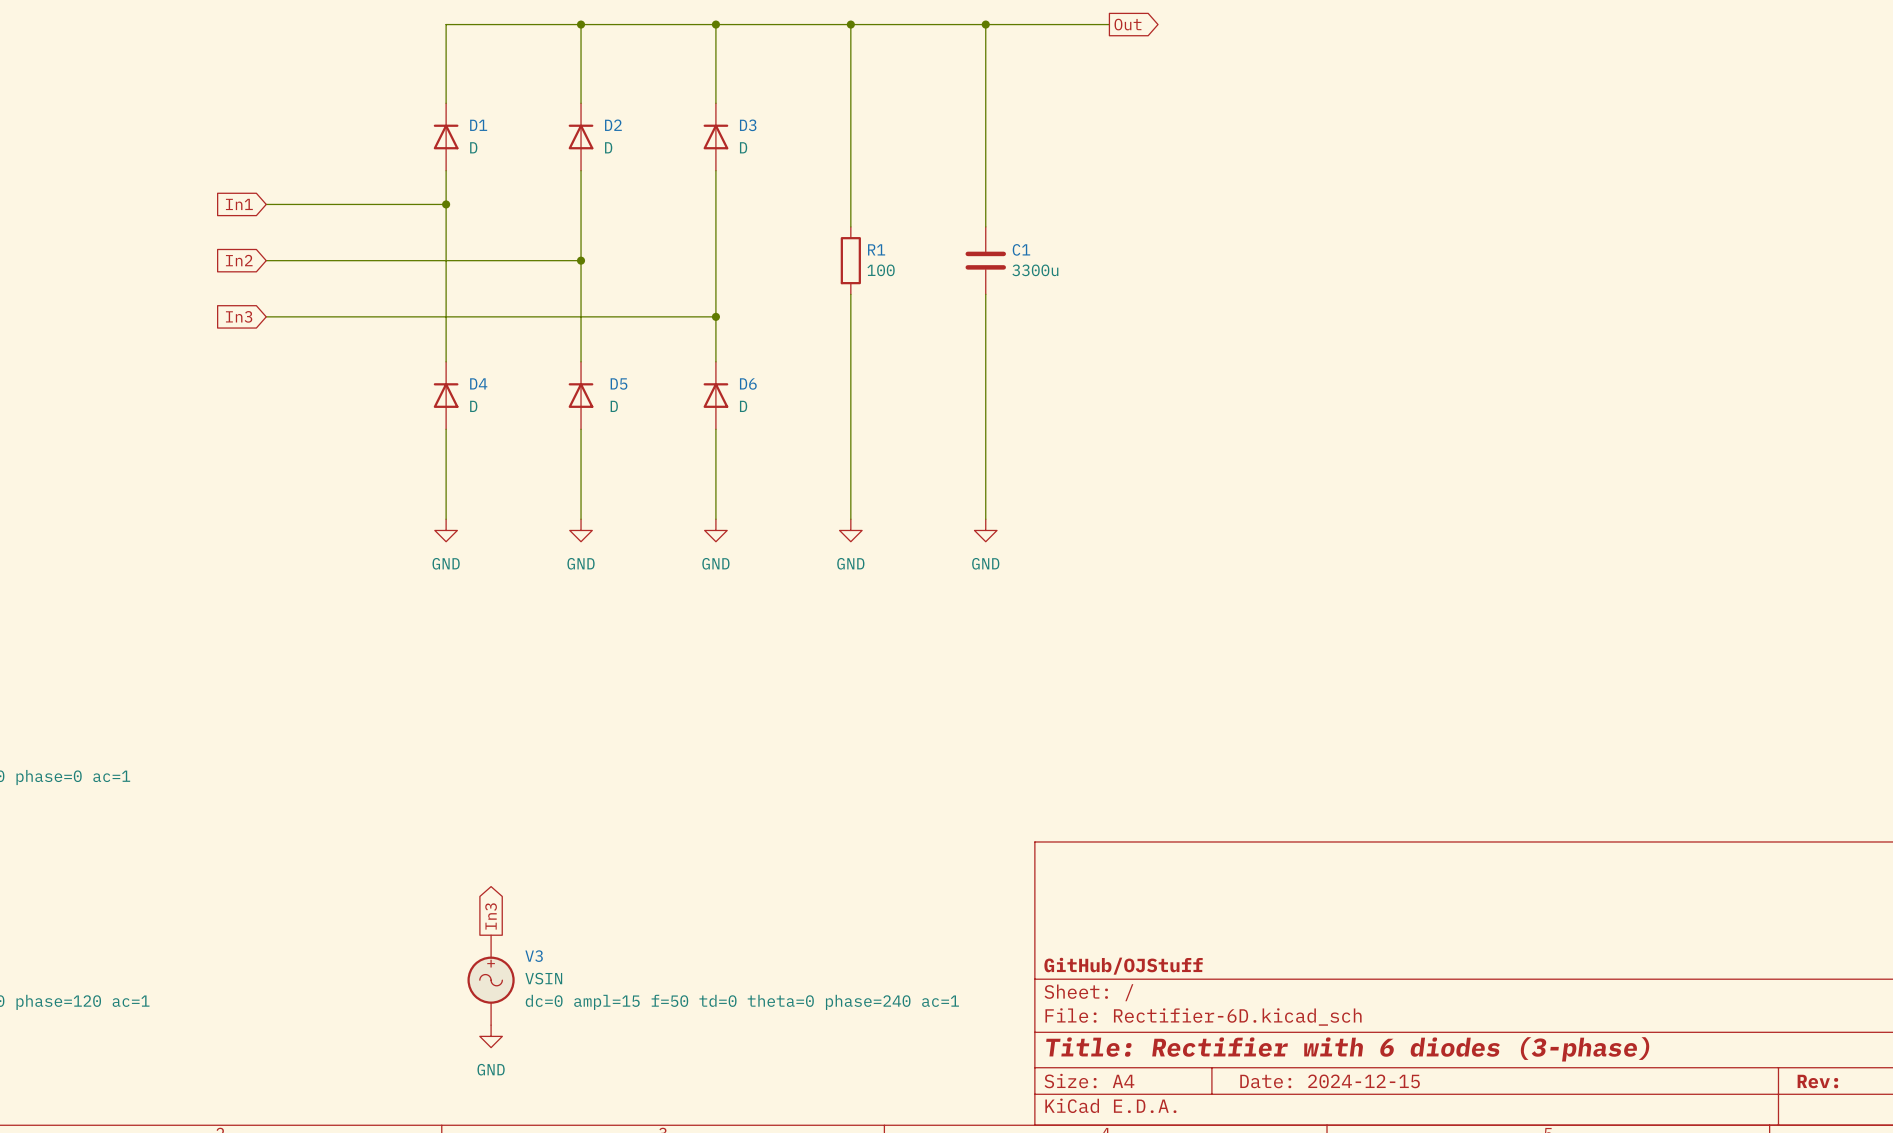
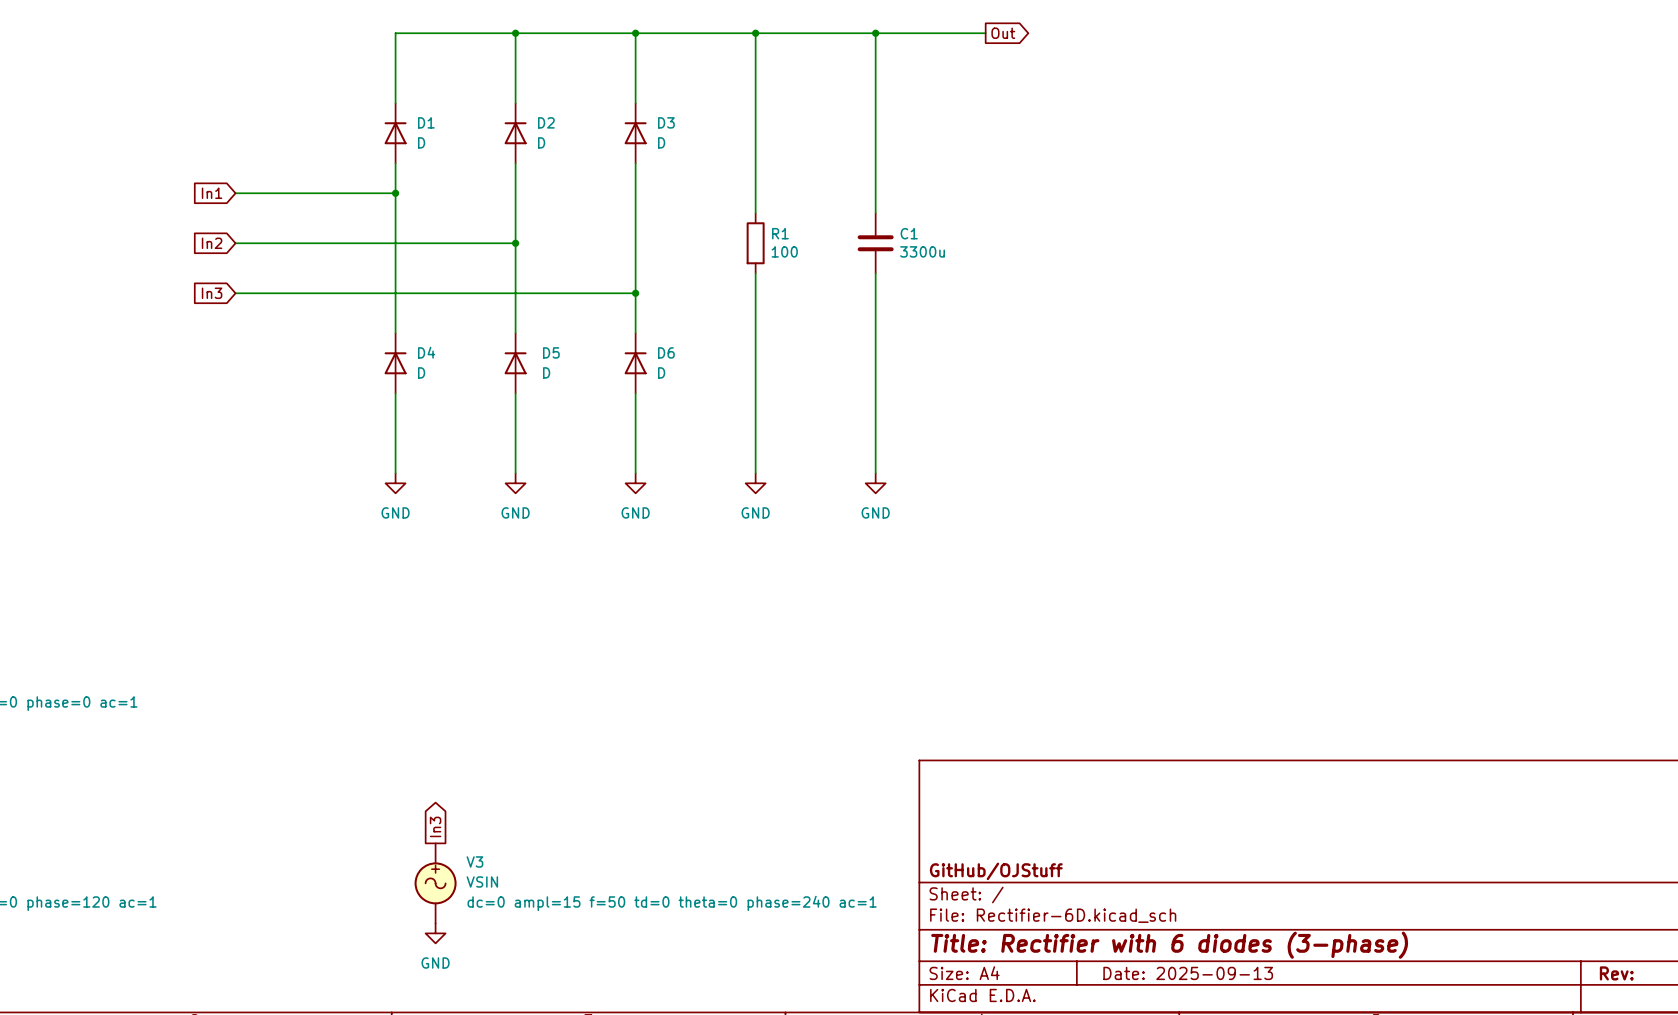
title block: Date: 2024-12-15 (1330, 1081) -> Date: 2025-09-13 (1188, 973)

